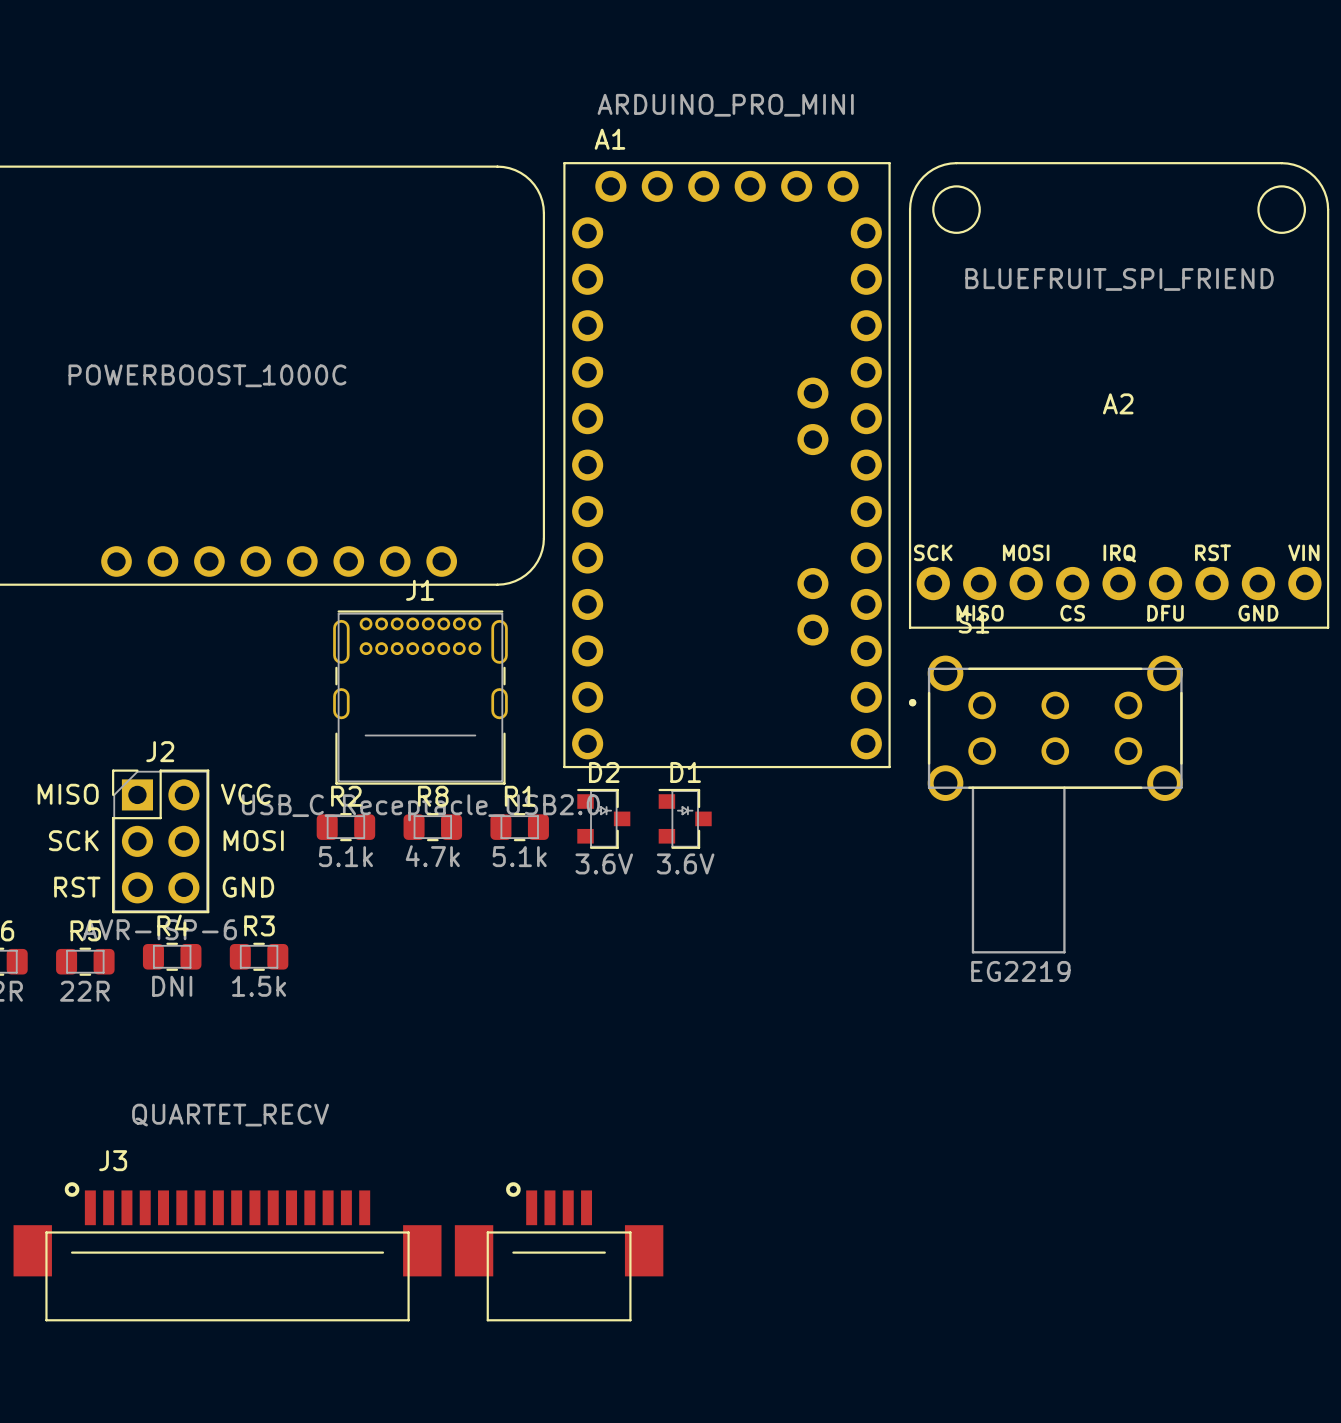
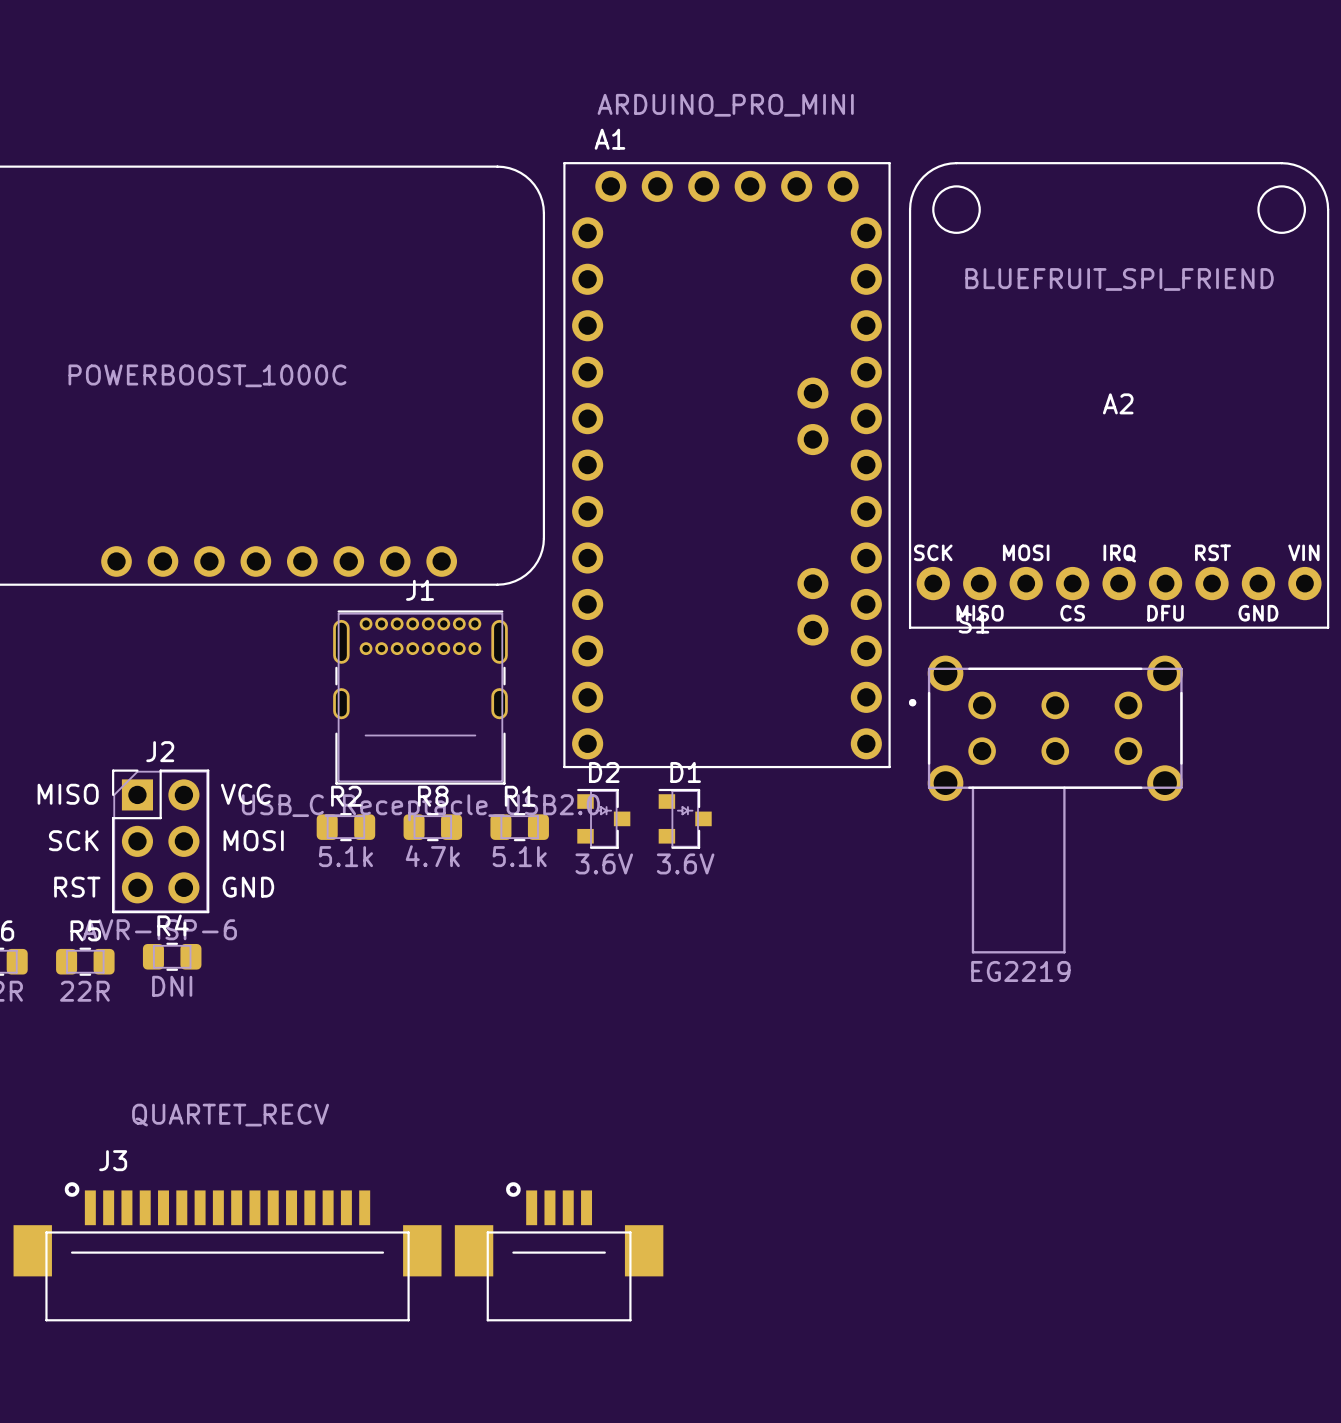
R3: 1.5k (259, 956) -> none

